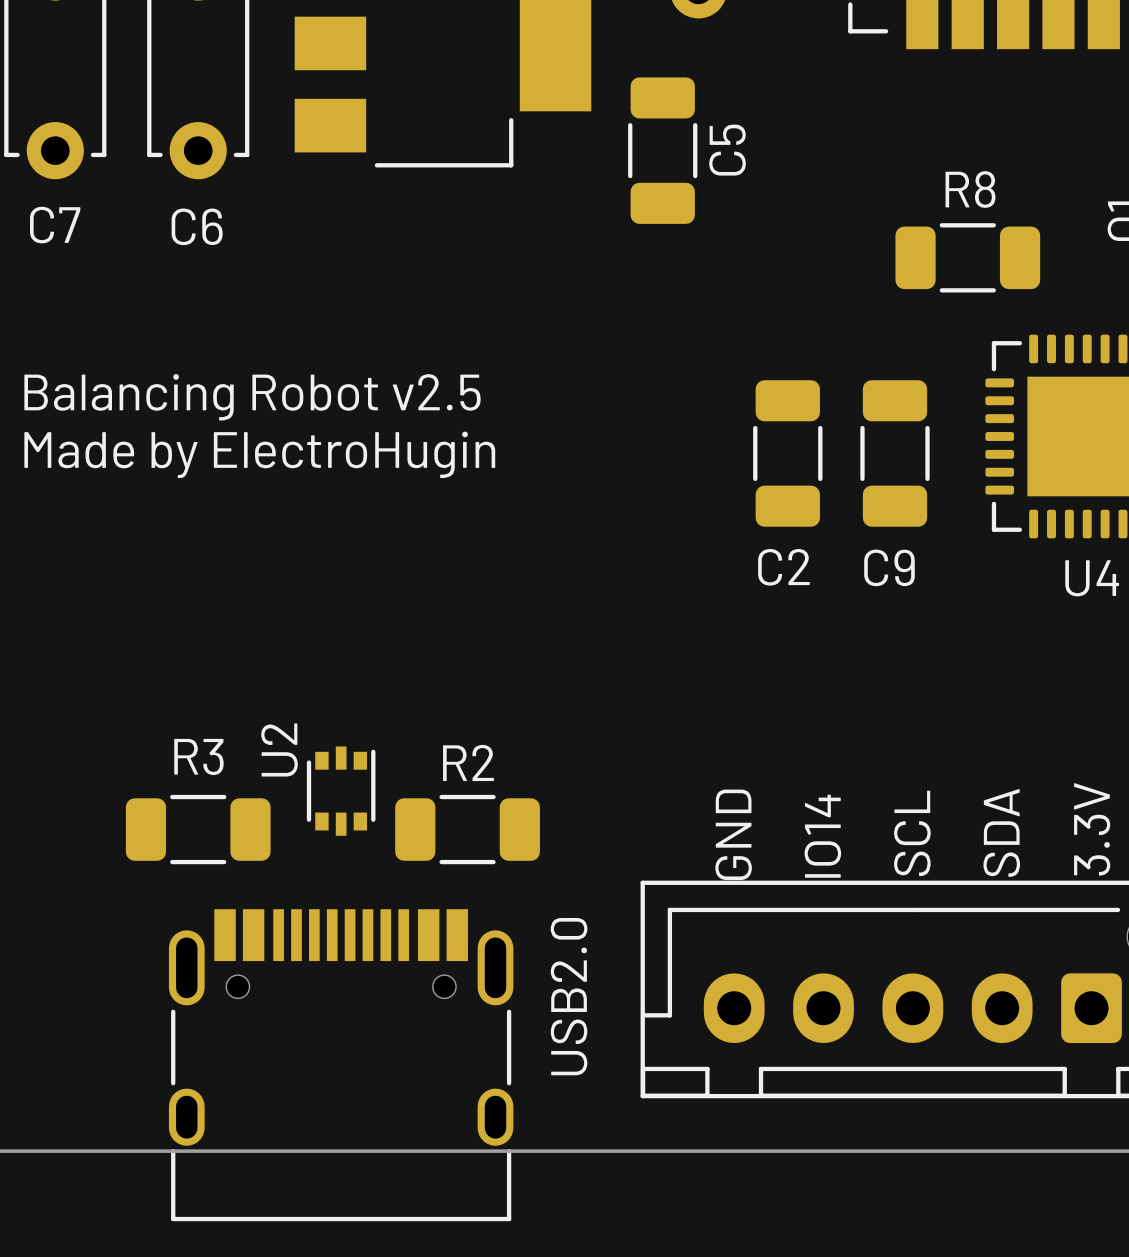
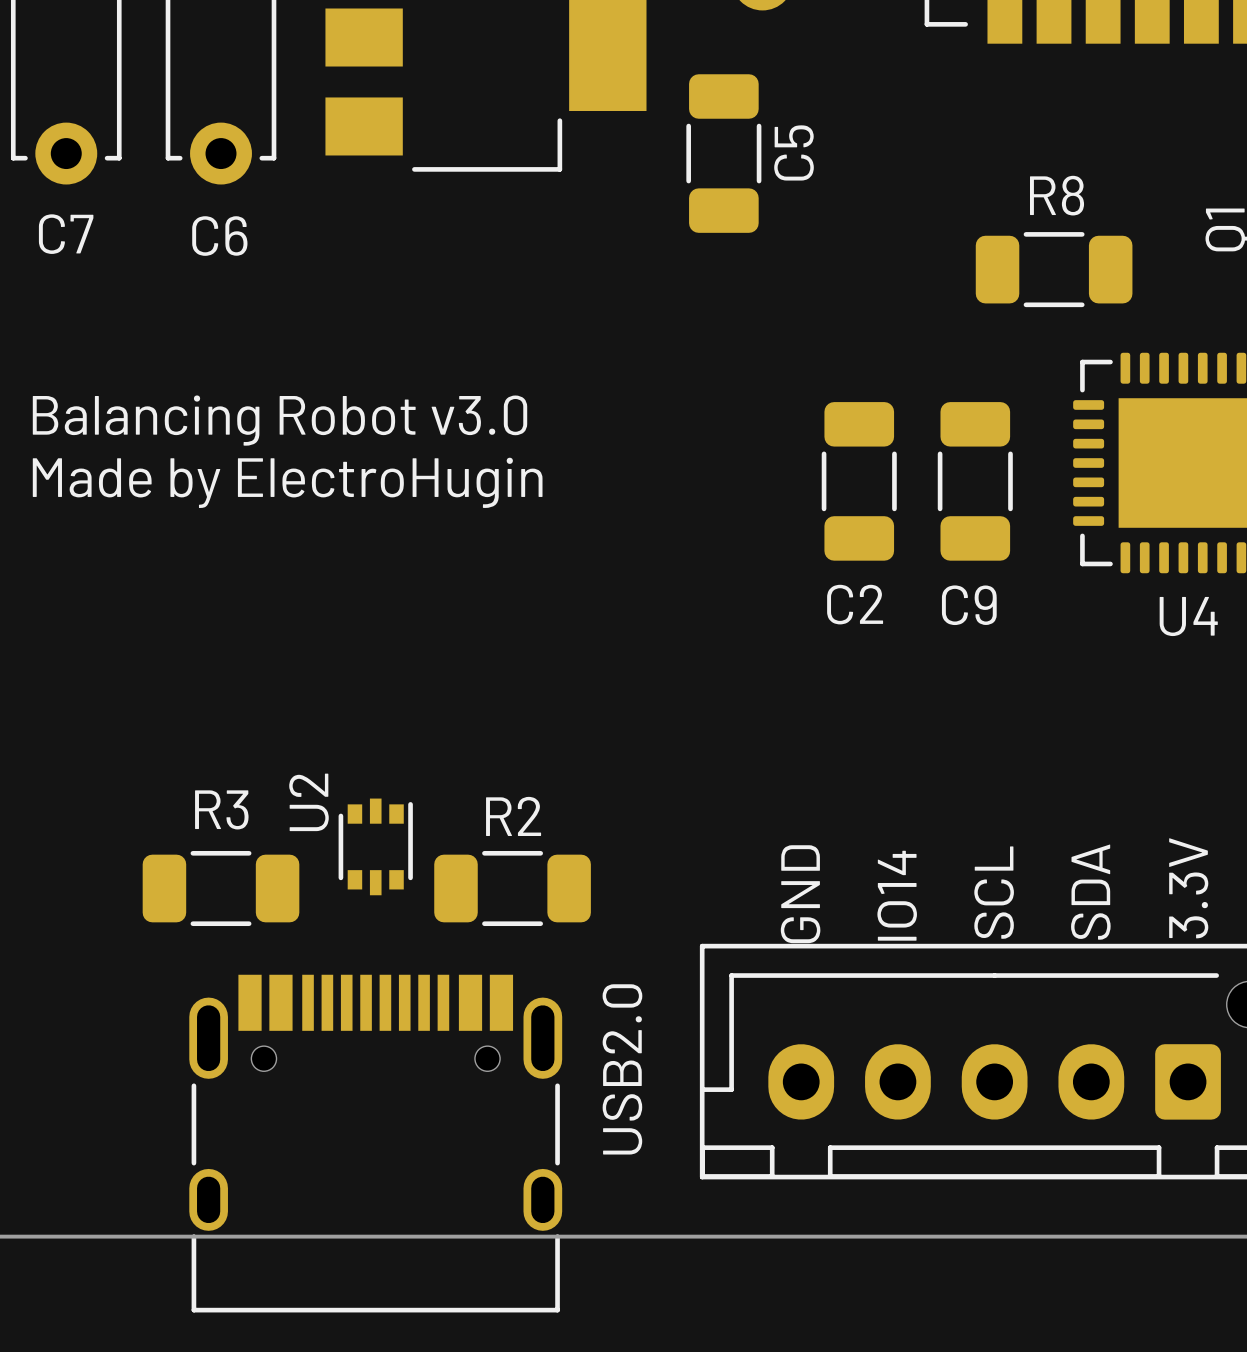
text: Balancing Robot v2.5 (252, 397) -> Balancing Robot v3.0 (280, 420)

